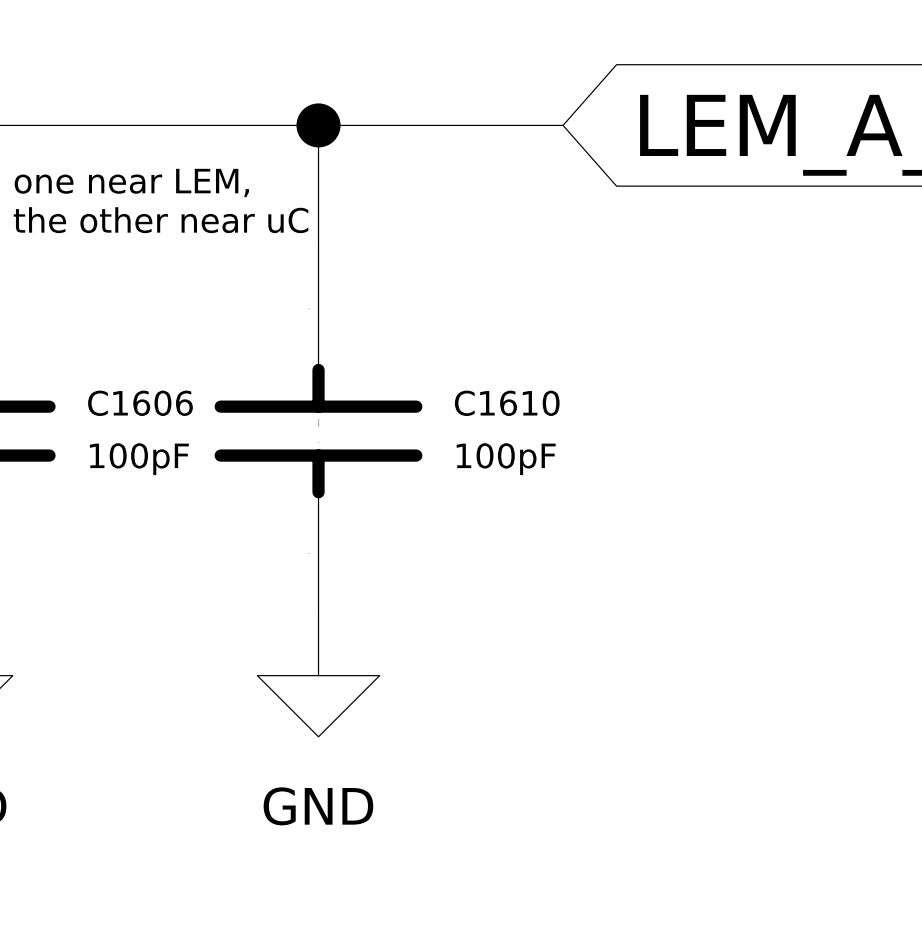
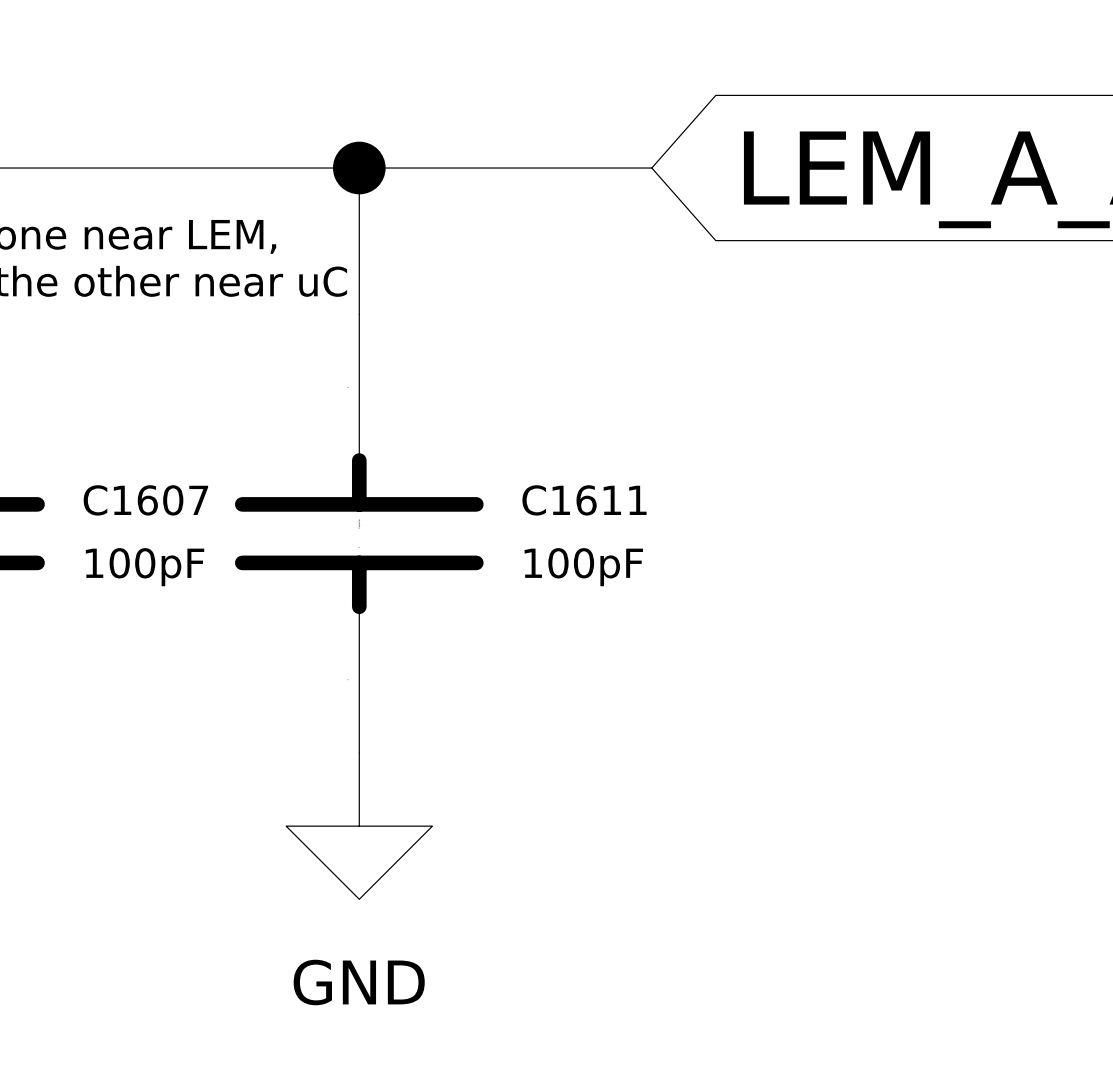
C1606 name: C1606 (140, 403) -> C1607 (145, 500)
C1610 name: C1610 (507, 403) -> C1611 (584, 500)

